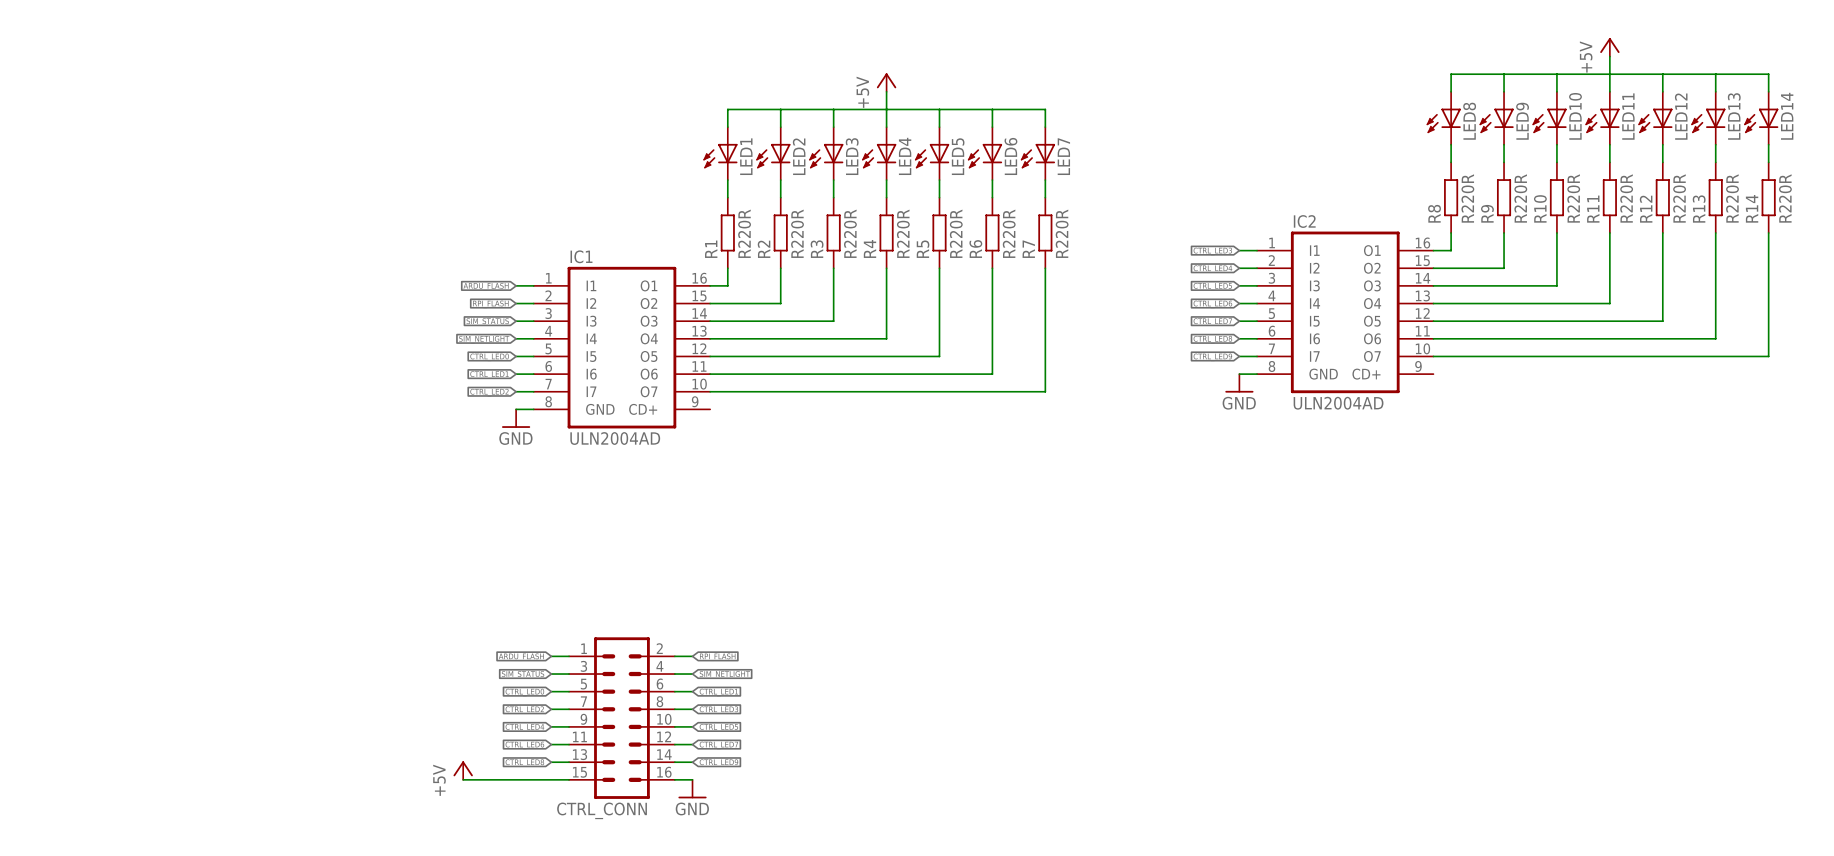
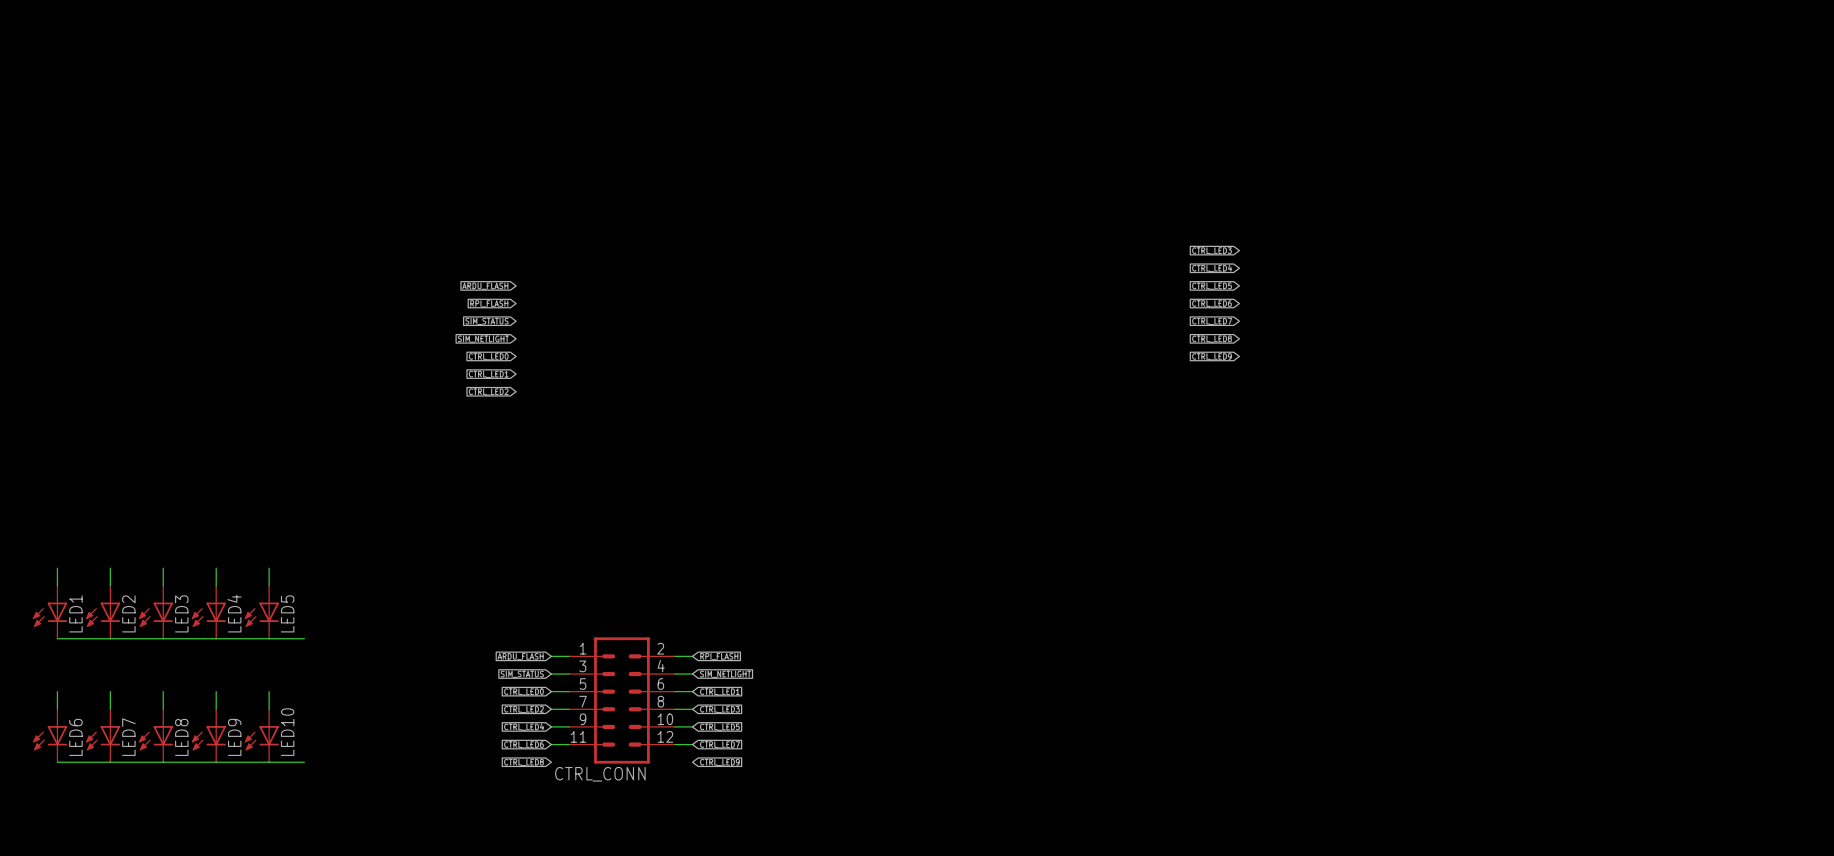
power symbol: +5V (1609, 47) -> none
wire: (1609, 56) (1609, 91) -> none
wire: (1504, 74) (1504, 91) -> none
wire: (1556, 74) (1556, 91) -> none
wire: (1662, 74) (1662, 91) -> none
wire: (1715, 74) (1715, 91) -> none
power symbol: +5V (886, 82) -> none
wire: (886, 91) (886, 127) -> none
wire: (1451, 91) (1451, 74) (1768, 74) (1768, 91) -> none
wire: (780, 109) (780, 127) -> none
wire: (833, 109) (833, 127) -> none
wire: (939, 109) (939, 127) -> none
wire: (992, 109) (992, 127) -> none
LED8 position: (1443, 118) -> (155, 735)
LED9 position: (1496, 118) -> (208, 735)
LED10 position: (1549, 118) -> (261, 735)
LED11: (1602, 118) -> none
LED12: (1655, 118) -> none
LED13: (1708, 118) -> none
LED14: (1761, 118) -> none
wire: (727, 127) (727, 109) (1045, 109) (1045, 127) -> none
wire: (1451, 144) (1451, 162) -> none
wire: (1504, 144) (1504, 162) -> none
wire: (1556, 144) (1556, 162) -> none
wire: (1609, 144) (1609, 162) -> none
wire: (1662, 144) (1662, 162) -> none
wire: (1715, 144) (1715, 162) -> none
wire: (1768, 144) (1768, 162) -> none
LED1 position: (720, 153) -> (50, 612)
LED2 position: (773, 153) -> (103, 612)
LED3 position: (826, 153) -> (155, 612)
LED4 position: (879, 153) -> (208, 612)
LED5 position: (932, 153) -> (261, 612)
LED6 position: (985, 153) -> (50, 735)
LED7 position: (1038, 153) -> (103, 735)
wire: (727, 180) (727, 197) -> none
wire: (780, 180) (780, 197) -> none
wire: (833, 180) (833, 197) -> none
wire: (886, 180) (886, 197) -> none
wire: (939, 180) (939, 197) -> none
wire: (992, 180) (992, 197) -> none
wire: (1045, 180) (1045, 197) -> none
R8: R220R (1451, 197) -> none
R9: R220R (1504, 197) -> none
R10: R220R (1556, 197) -> none
R11: R220R (1609, 197) -> none
R12: R220R (1662, 197) -> none
R13: R220R (1715, 197) -> none
R14: R220R (1768, 197) -> none
R1: R220R (727, 232) -> none
R2: R220R (780, 232) -> none
R3: R220R (833, 232) -> none
R4: R220R (886, 232) -> none
R5: R220R (939, 232) -> none
R6: R220R (992, 232) -> none
R7: R220R (1045, 232) -> none
wire: (1451, 232) (1451, 250) (1433, 250) -> none
wire: (1504, 232) (1504, 268) (1433, 268) -> none
wire: (1556, 232) (1556, 285) (1433, 285) -> none
wire: (1609, 232) (1609, 303) (1433, 303) -> none
wire: (1662, 232) (1662, 321) (1433, 321) -> none
wire: (1715, 232) (1715, 338) (1433, 338) -> none
wire: (1768, 232) (1768, 356) (1433, 356) -> none
wire: (1239, 250) (1257, 250) -> none
wire: (727, 268) (727, 285) (710, 285) -> none
wire: (780, 268) (780, 303) (710, 303) -> none
wire: (833, 268) (833, 321) (710, 321) -> none
wire: (886, 268) (886, 338) (710, 338) -> none
wire: (939, 268) (939, 356) (710, 356) -> none
wire: (992, 268) (992, 374) (710, 374) -> none
wire: (1045, 268) (1045, 391) (710, 391) -> none
wire: (1239, 268) (1257, 268) -> none
wire: (516, 285) (533, 285) -> none
wire: (1239, 285) (1257, 285) -> none
wire: (516, 303) (533, 303) -> none
wire: (1239, 303) (1257, 303) -> none
IC2: ULN2004AD (1345, 312) -> none
wire: (516, 321) (533, 321) -> none
wire: (1239, 321) (1257, 321) -> none
wire: (516, 338) (533, 338) -> none
wire: (1239, 338) (1257, 338) -> none
IC1: ULN2004AD (621, 347) -> none
wire: (516, 356) (533, 356) -> none
wire: (1239, 356) (1257, 356) -> none
wire: (516, 374) (533, 374) -> none
wire: (1239, 374) (1257, 374) -> none
power symbol: GND (1239, 383) -> none
wire: (516, 391) (533, 391) -> none
wire: (516, 409) (533, 409) -> none
power symbol: GND (516, 418) -> none
wire: none -> (57, 568) (57, 585)
wire: none -> (110, 568) (110, 585)
wire: none -> (163, 568) (163, 585)
wire: none -> (216, 568) (216, 585)
wire: none -> (269, 568) (269, 585)
wire: none -> (57, 638) (304, 638)
wire: none -> (57, 691) (57, 709)
wire: none -> (110, 691) (110, 709)
wire: none -> (163, 691) (163, 709)
wire: none -> (216, 691) (216, 709)
wire: none -> (269, 691) (269, 709)
CTRL_CONN: none -> (621, 700)
CTRL_CONN: (621, 718) -> none
wire: none -> (57, 762) (304, 762)
wire: (551, 762) (569, 762) -> none
wire: (674, 762) (692, 762) -> none
power symbol: +5V (463, 770) -> none
wire: (463, 779) (569, 779) -> none
wire: (674, 779) (692, 779) -> none
power symbol: GND (692, 789) -> none

